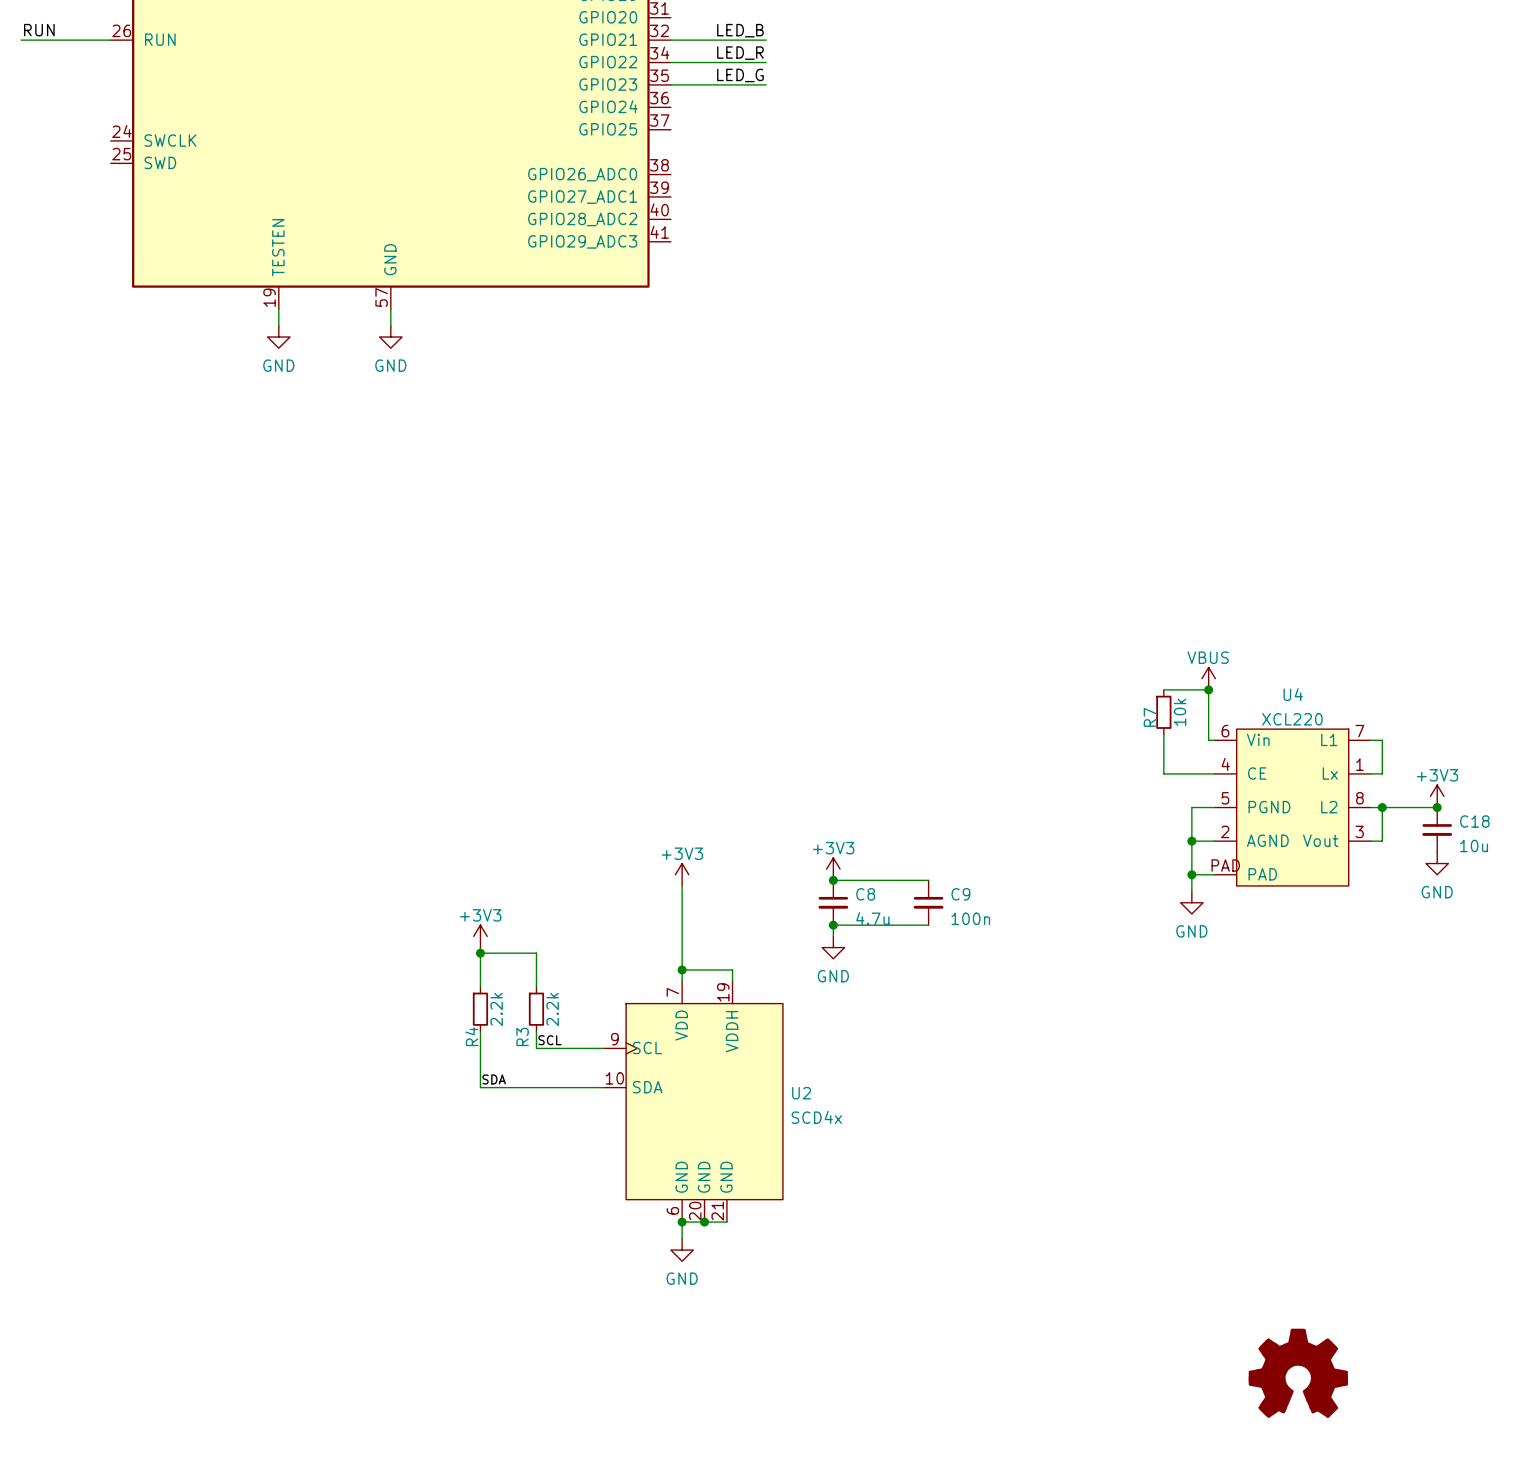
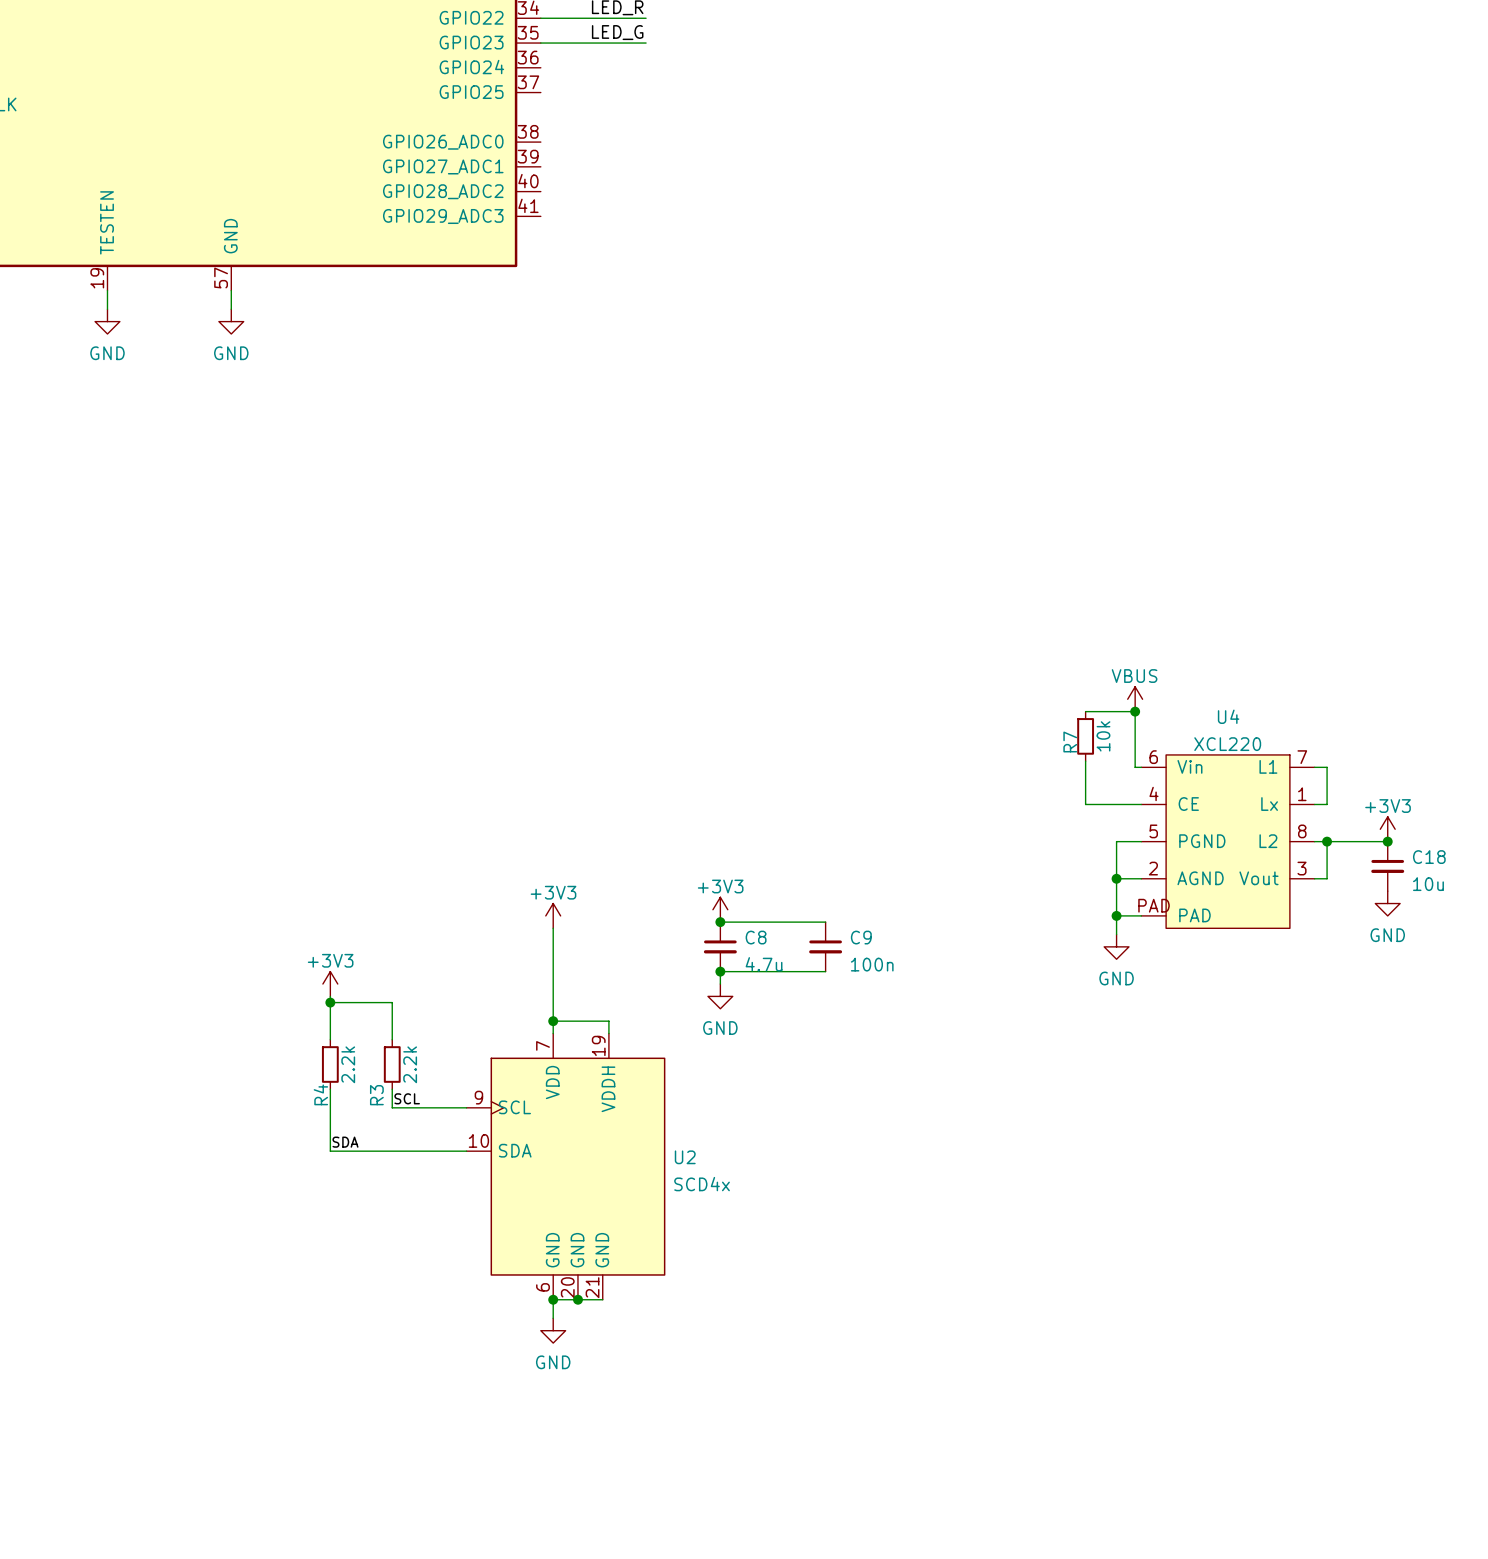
power symbol: (1298, 1373) -> none

